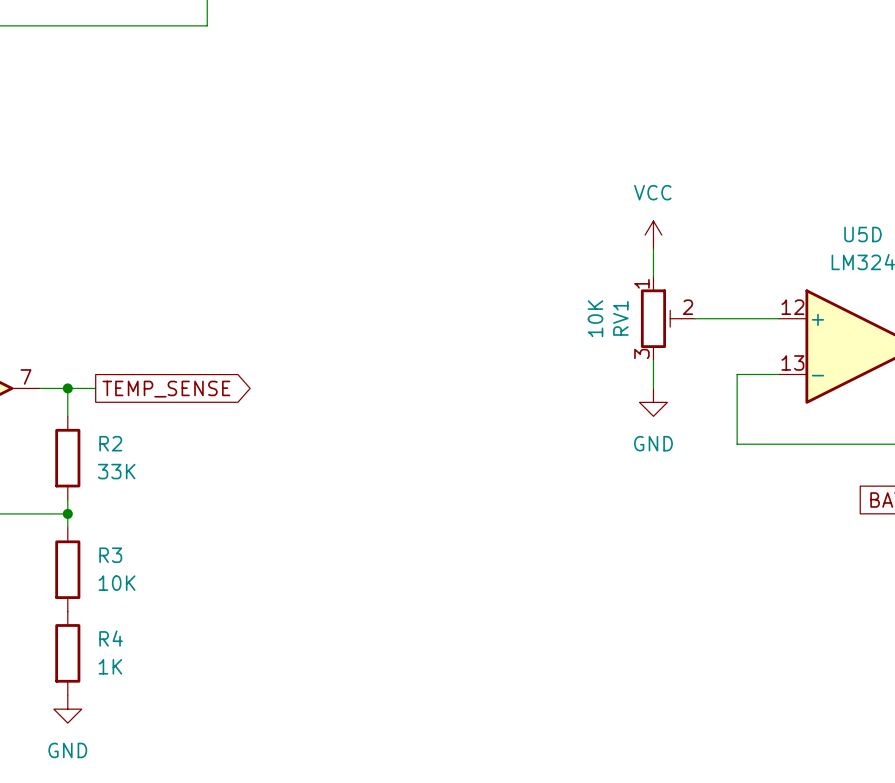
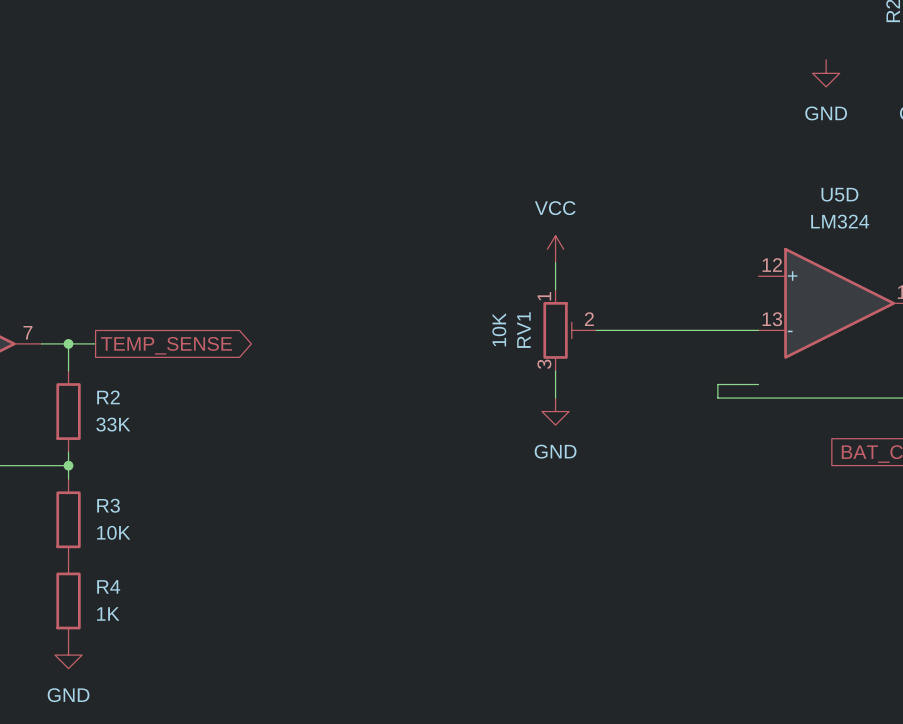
power symbol: none -> GND (826, 73)
power symbol position: VCC (653, 235) -> VCC (555, 249)
wire: (653, 248) (653, 276) -> (555, 262) (555, 289)
RV1 position: (668, 318) -> (569, 330)
wire: (695, 318) (778, 318) -> none
wire: (653, 360) (653, 388) -> (555, 370) (555, 398)
wire: none -> (596, 330) (717, 330)
wire: (737, 374) (737, 430) -> (758, 384) (717, 384)
power symbol position: GND (653, 402) -> GND (555, 411)

